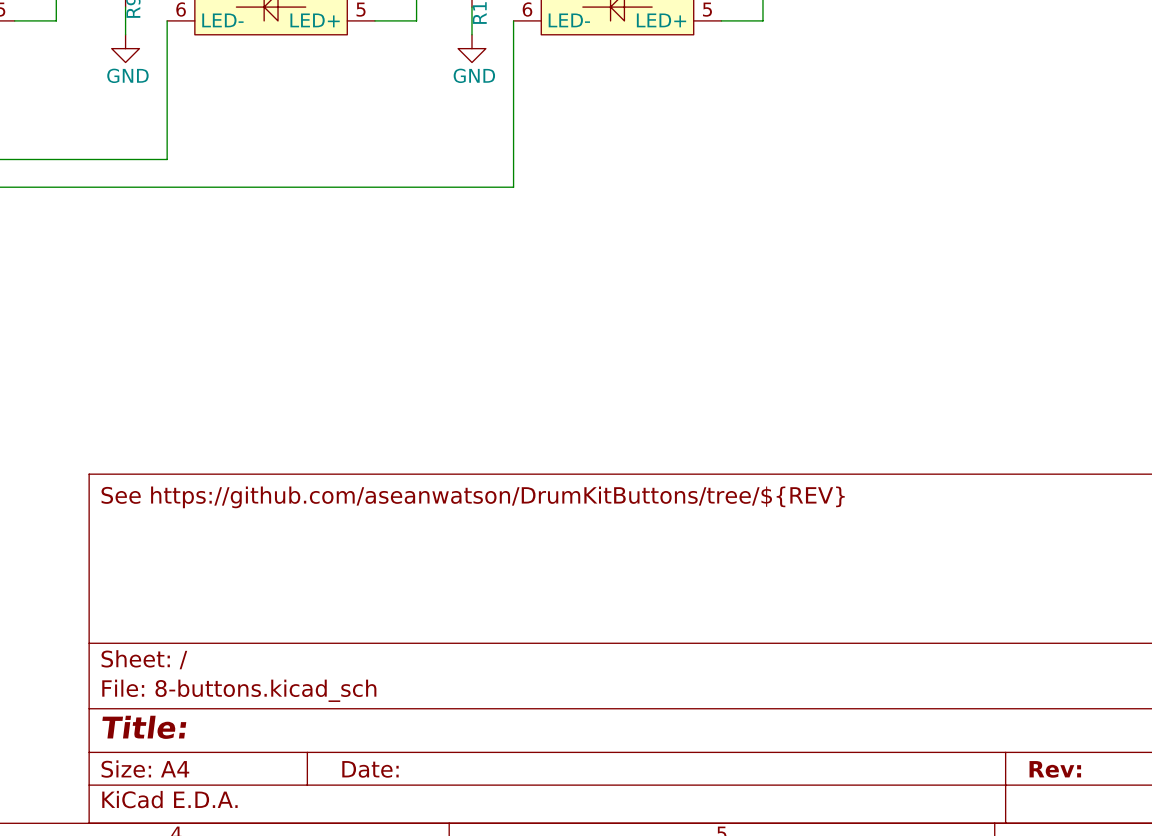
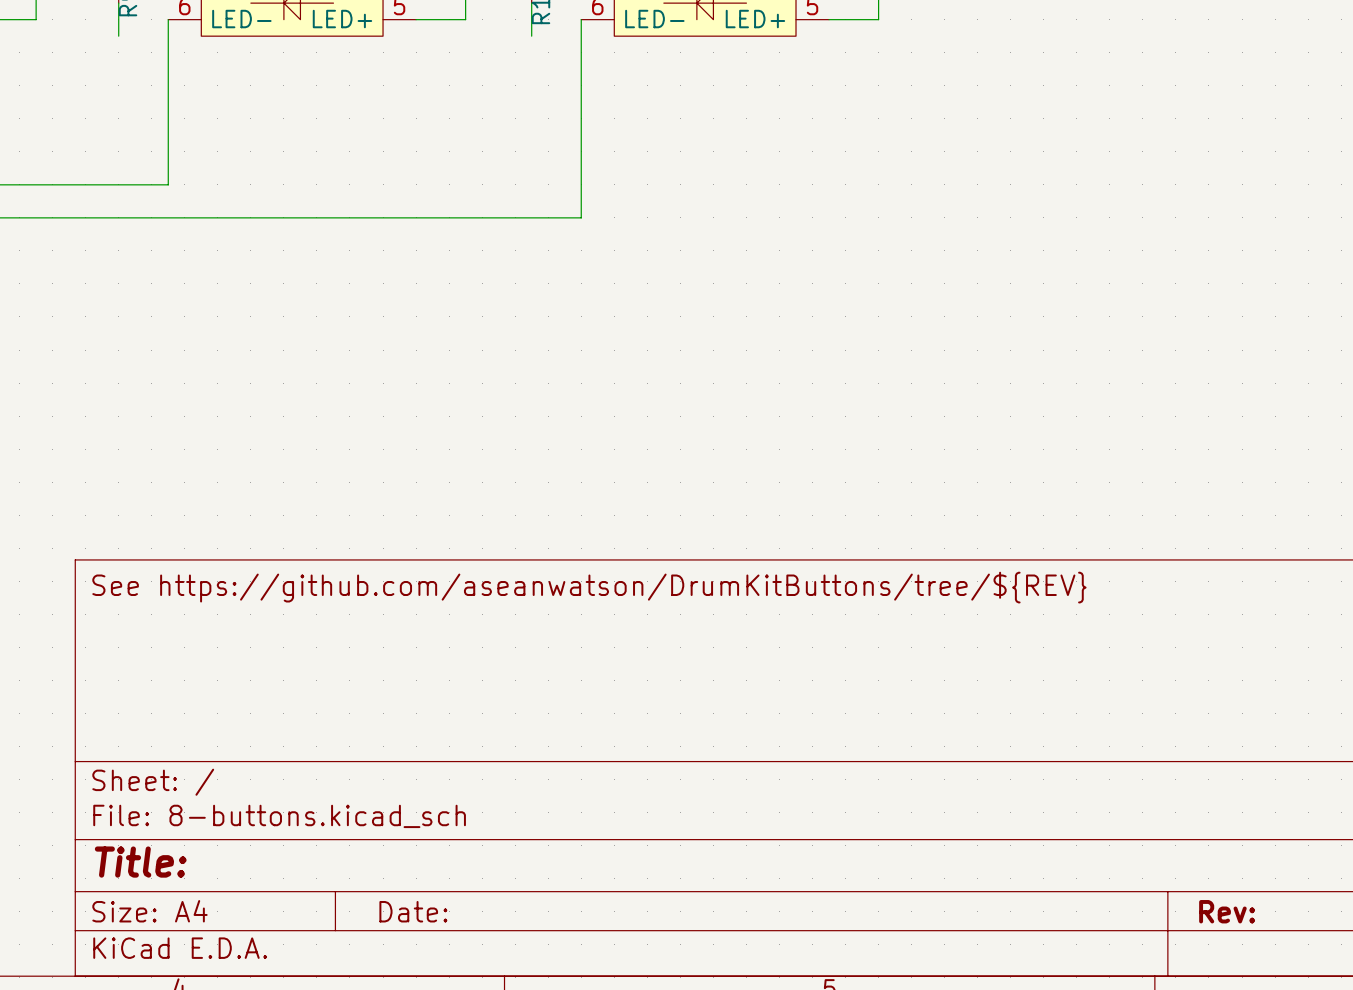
power symbol: GND (125, 48) -> none
power symbol: GND (471, 48) -> none

